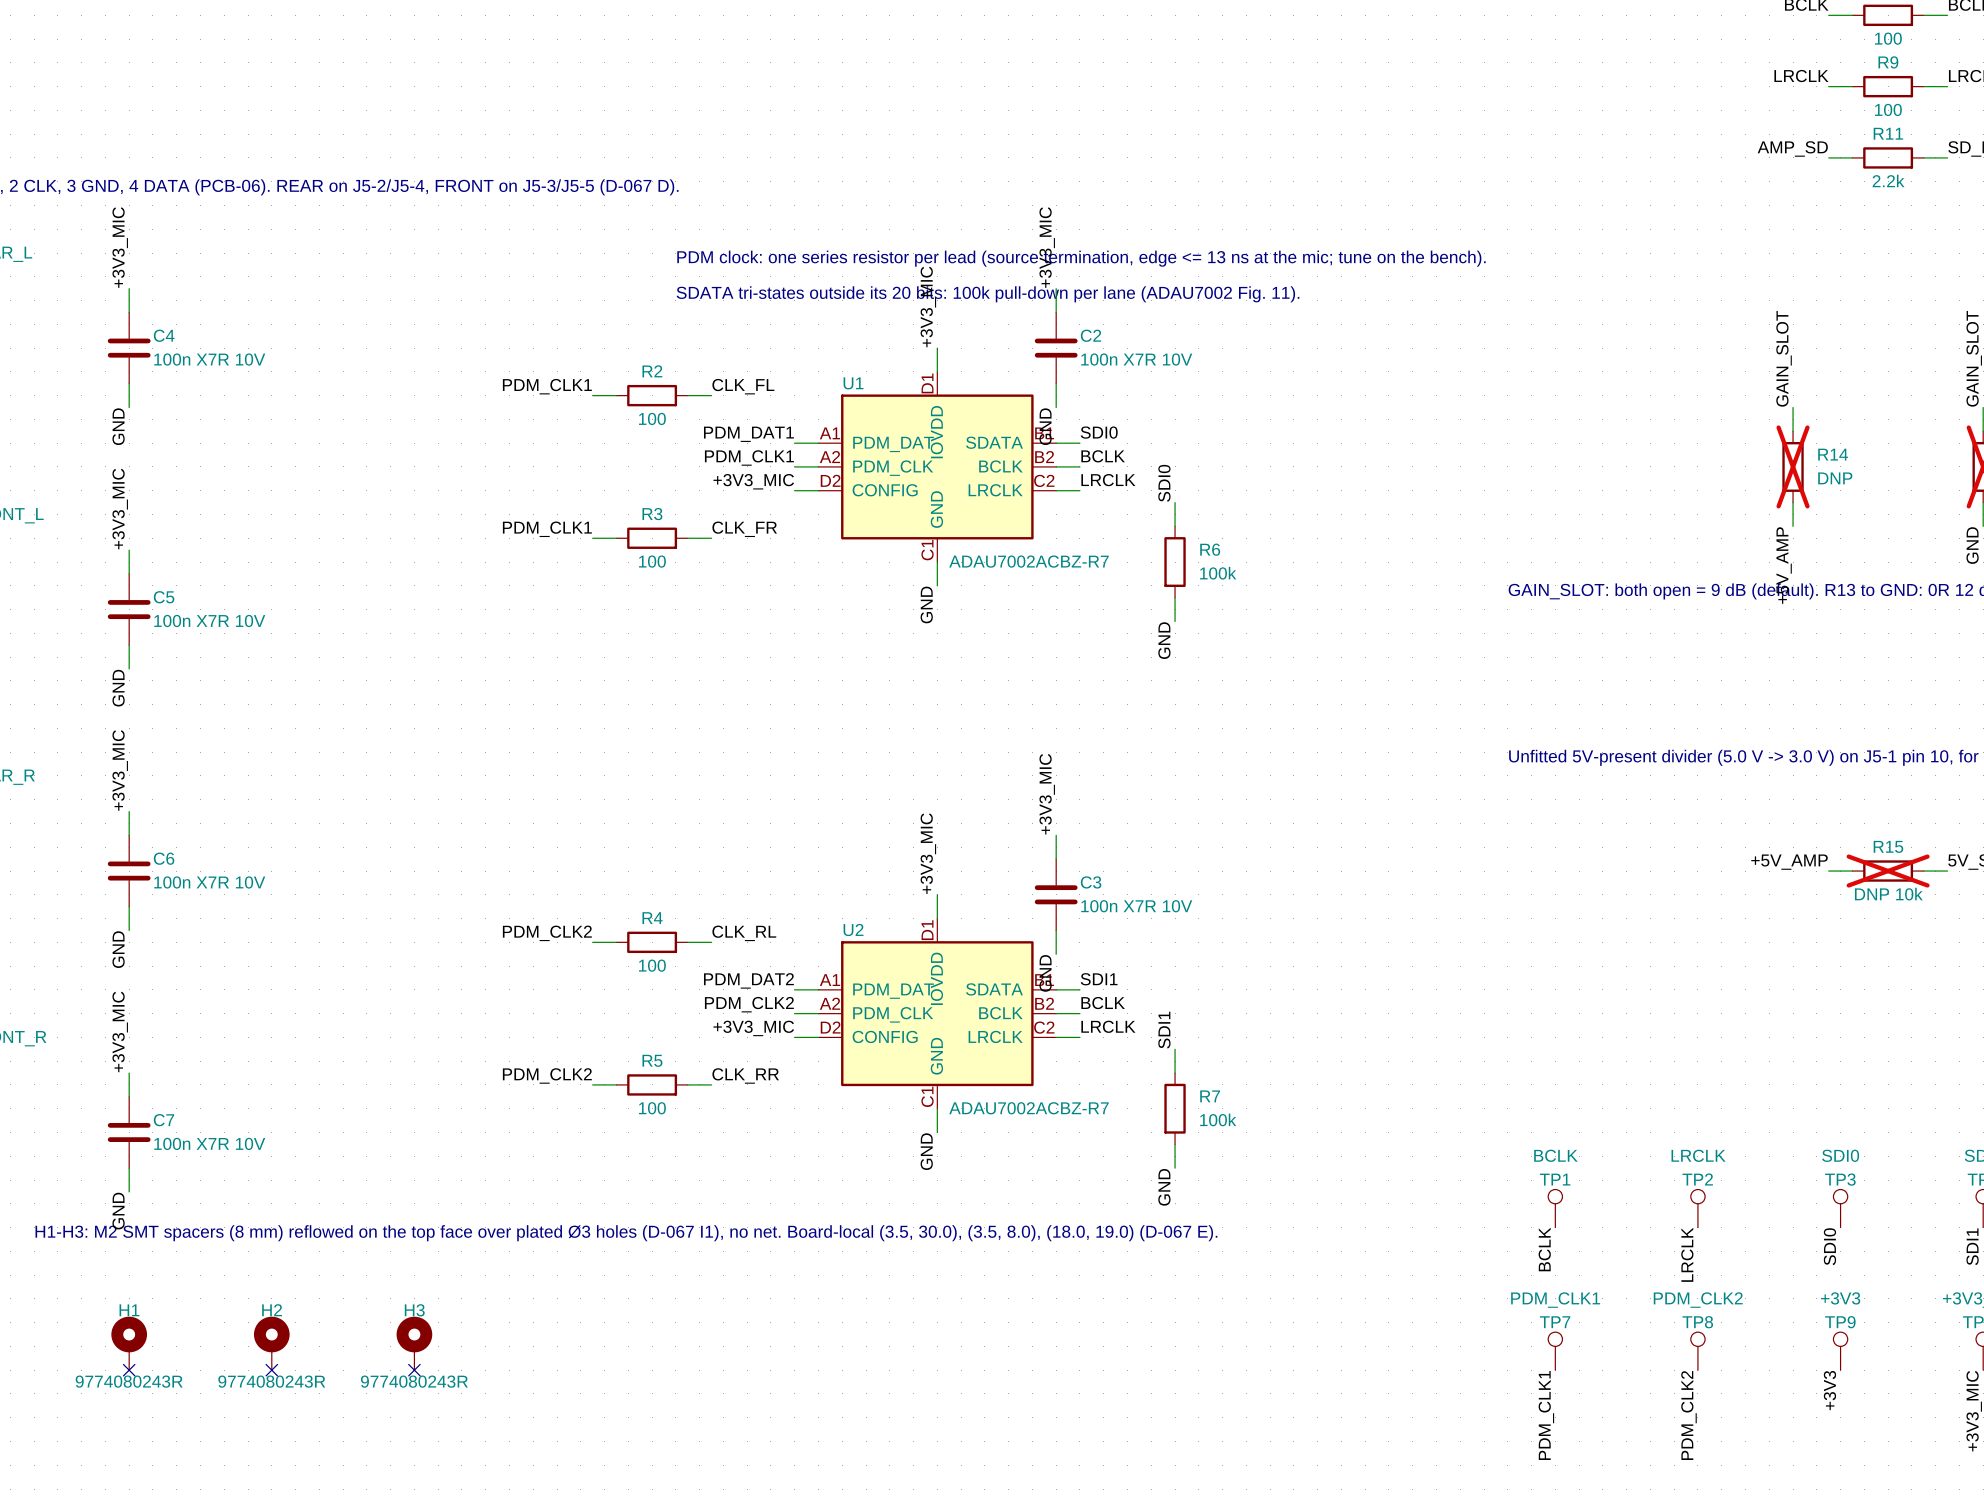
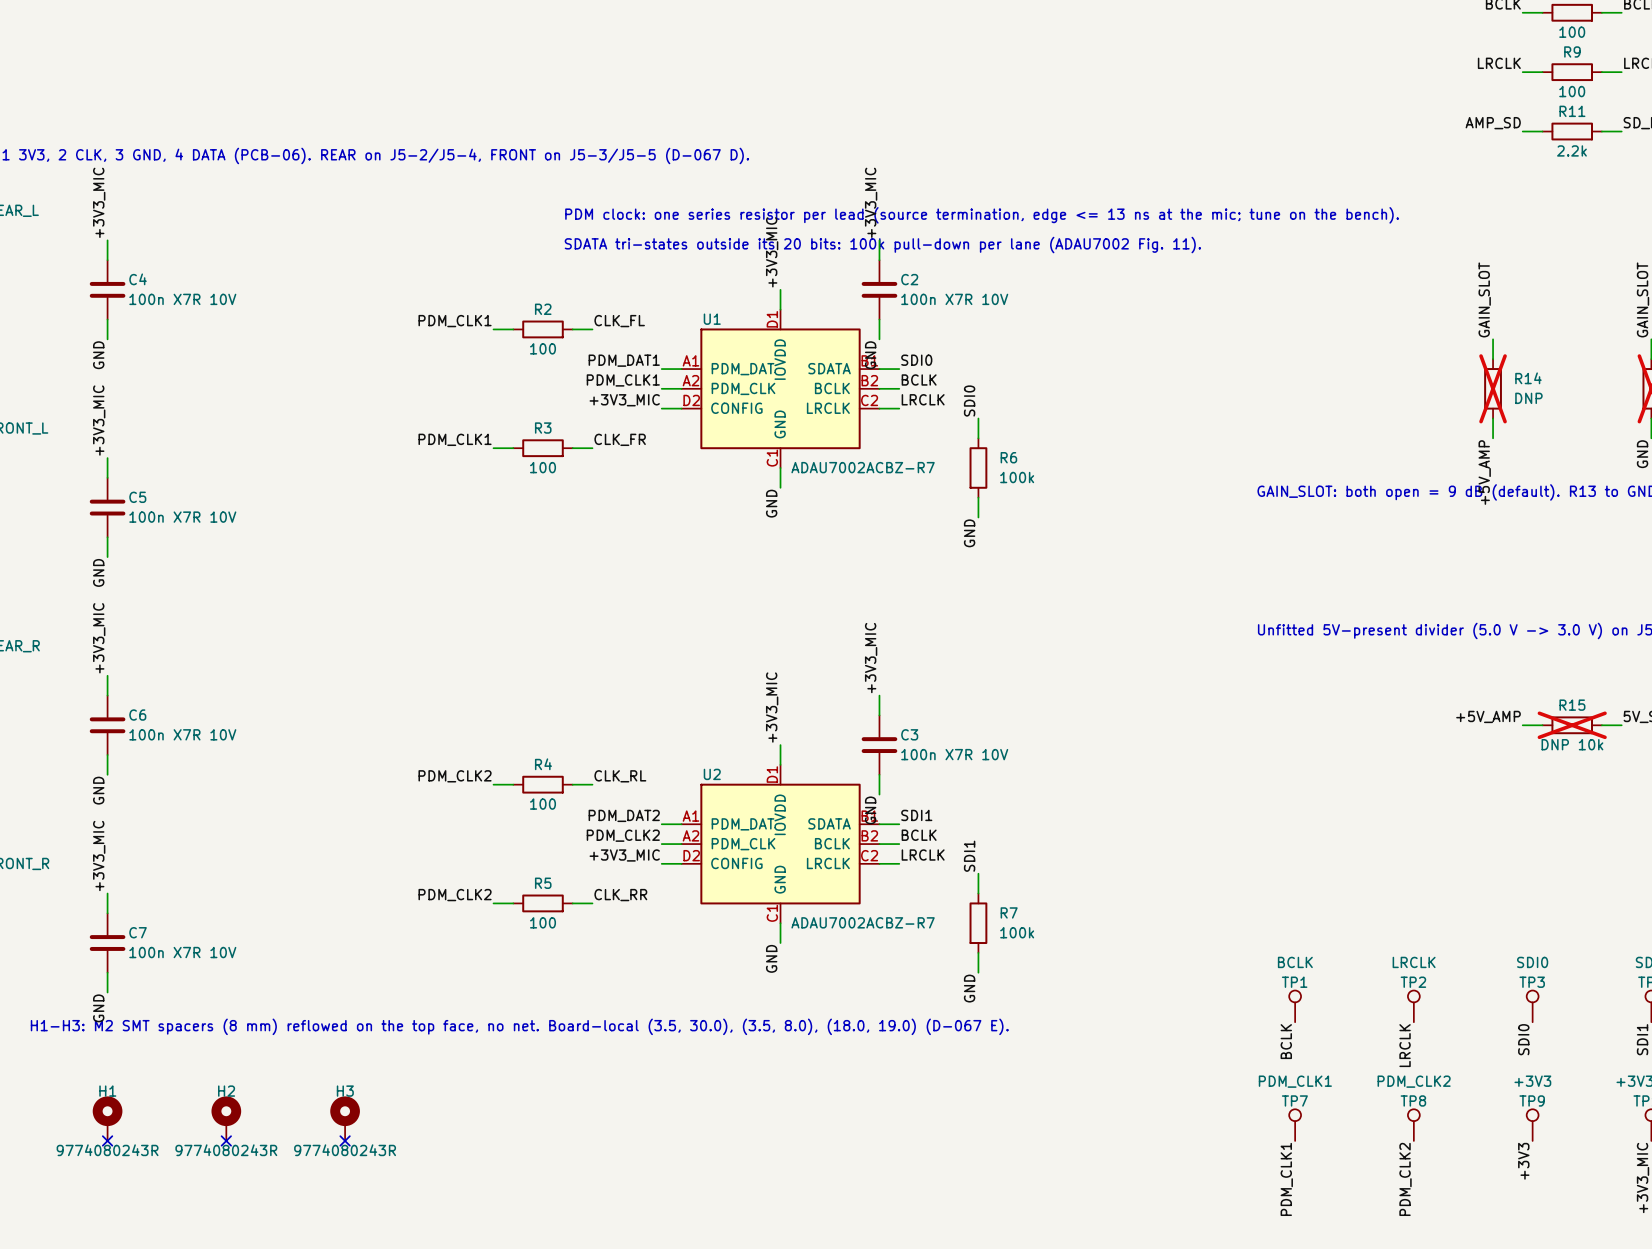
text: H1-H3: M2 SMT spacers (8 mm) reflowed on the top face over plated Ø3 holes (D-067 I1), no net. Board-local (3.5, 30.0), (3.5, 8.0), (18.0, 19.0) (D-067 E). (626, 1233) -> H1-H3: M2 SMT spacers (8 mm) reflowed on the top face, no net. Board-local (3.5, 30.0), (3.5, 8.0), (18.0, 19.0) (D-067 E). (519, 1026)

